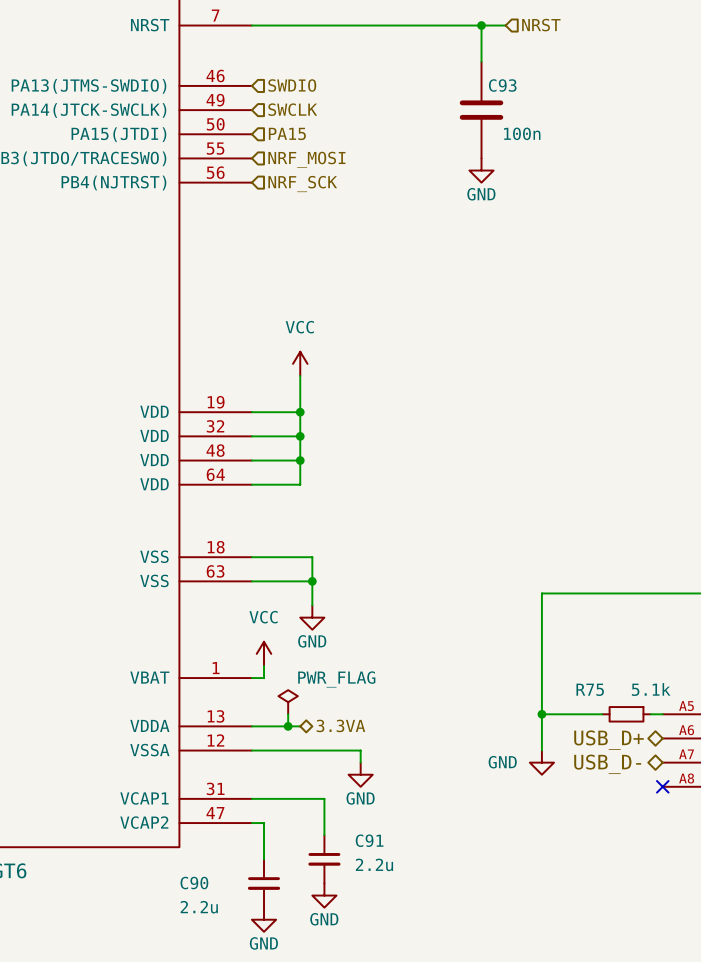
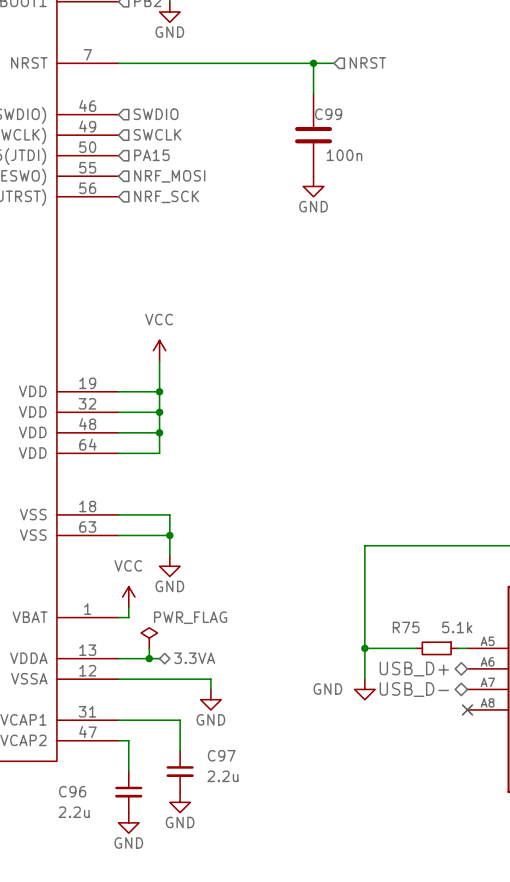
C93 name: C93 (502, 85) -> C99 (328, 114)
C91 name: C91 (369, 840) -> C97 (221, 755)
C90 name: C90 (194, 883) -> C96 (72, 791)

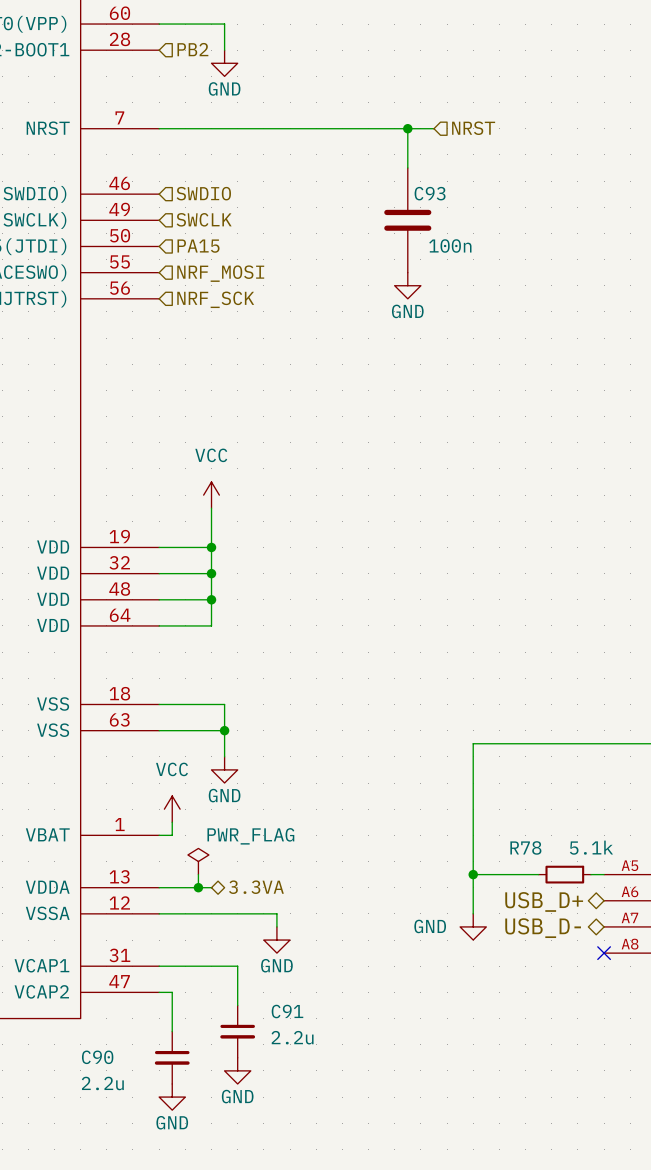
C99 name: C99 (328, 114) -> C93 (430, 193)
R75 name: R75 (406, 627) -> R78 (525, 847)
C97 name: C97 (221, 755) -> C91 (287, 1011)
C96 name: C96 (72, 791) -> C90 (97, 1057)

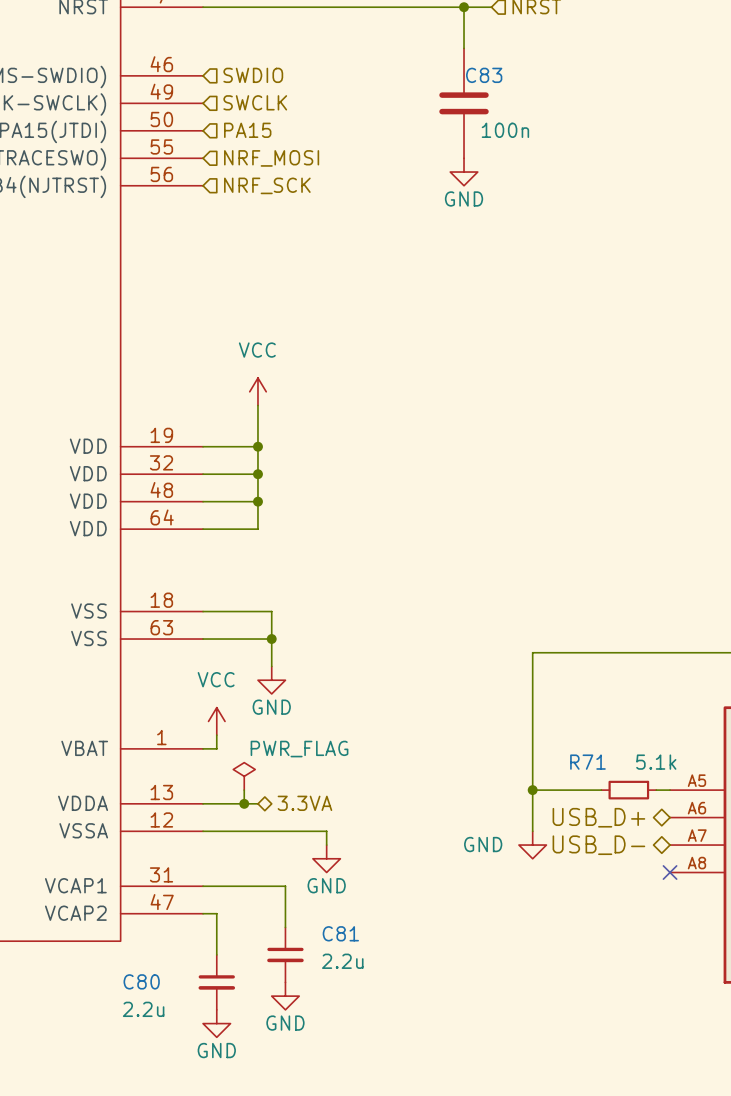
C93 name: C93 (430, 193) -> C83 (484, 75)
R78 name: R78 (525, 847) -> R71 (587, 762)
C91 name: C91 (287, 1011) -> C81 (340, 933)
C90 name: C90 (97, 1057) -> C80 (141, 981)

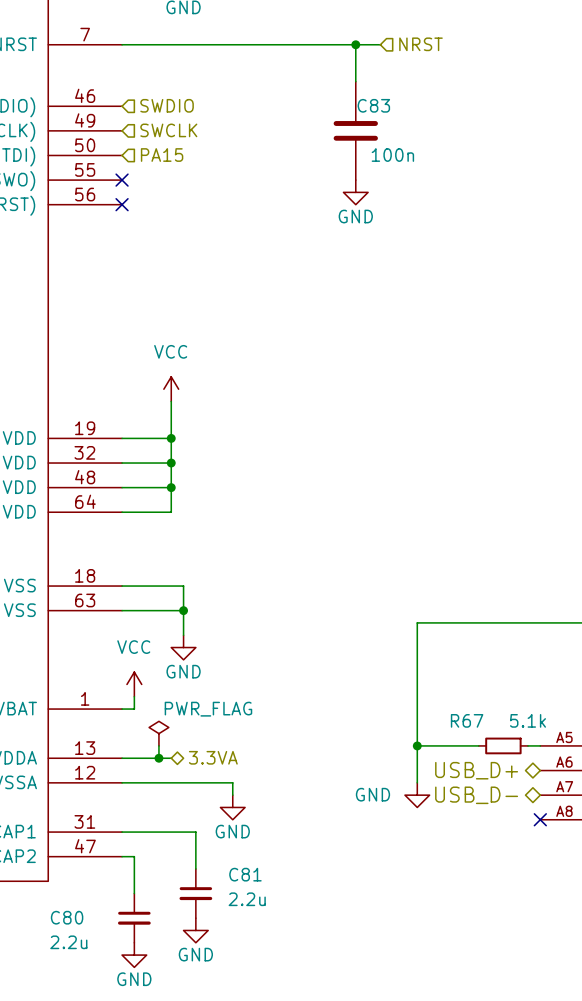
no-connect mark: none -> (122, 180)
hierarchical label: NRF_MOSI (271, 158) -> none
no-connect mark: none -> (122, 204)
hierarchical label: NRF_SCK (267, 185) -> none
R71 name: R71 (587, 762) -> R67 (467, 720)

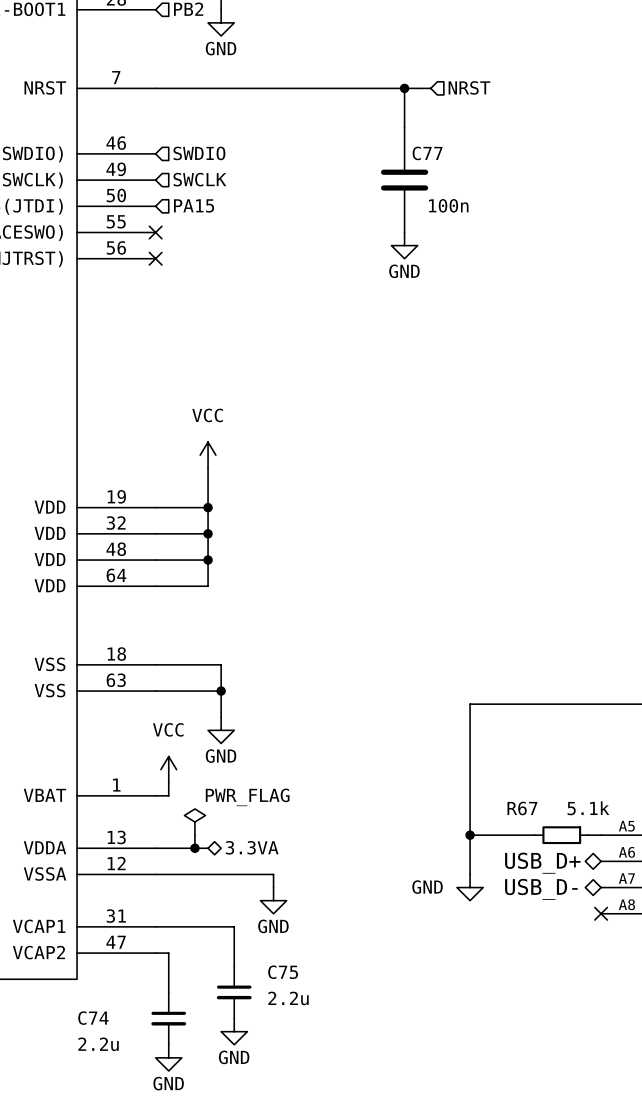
C83 name: C83 (373, 105) -> C77 (427, 153)
C81 name: C81 (245, 874) -> C75 (283, 972)
C80 name: C80 (67, 917) -> C74 (93, 1018)

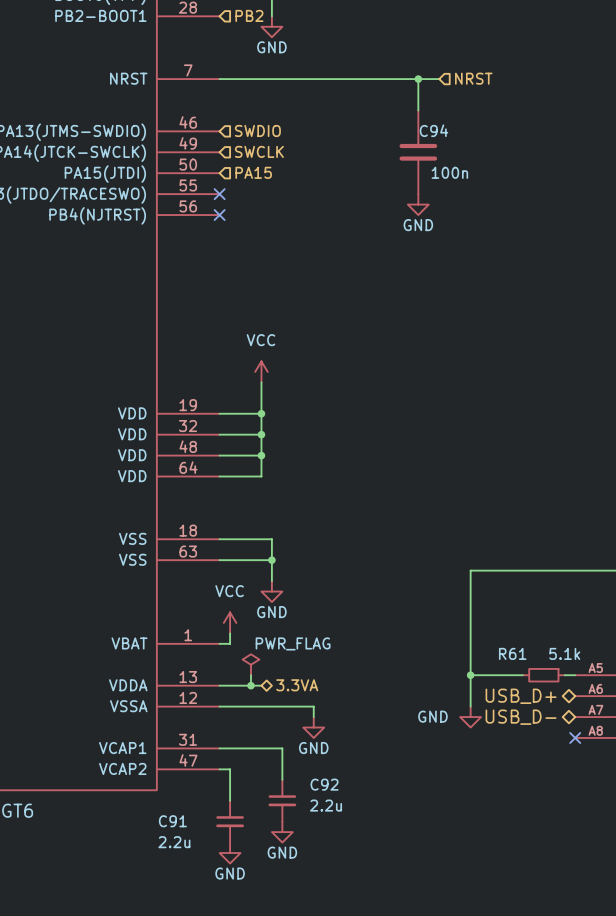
C77 name: C77 (427, 153) -> C94 (433, 130)
R67 name: R67 (522, 808) -> R61 (512, 653)
C75 name: C75 (283, 972) -> C92 (324, 784)
C74 name: C74 (93, 1018) -> C91 (172, 821)

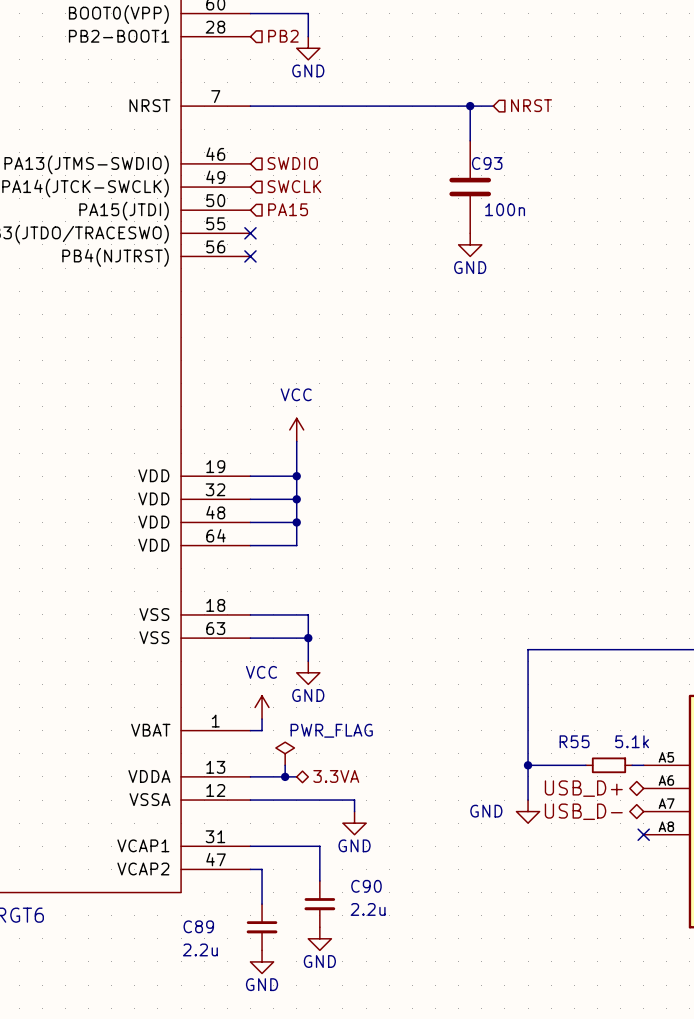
C94 name: C94 (433, 130) -> C93 (487, 163)
R61 name: R61 (512, 653) -> R55 (574, 741)
C92 name: C92 (324, 784) -> C90 (366, 886)
C91 name: C91 (172, 821) -> C89 (198, 926)

